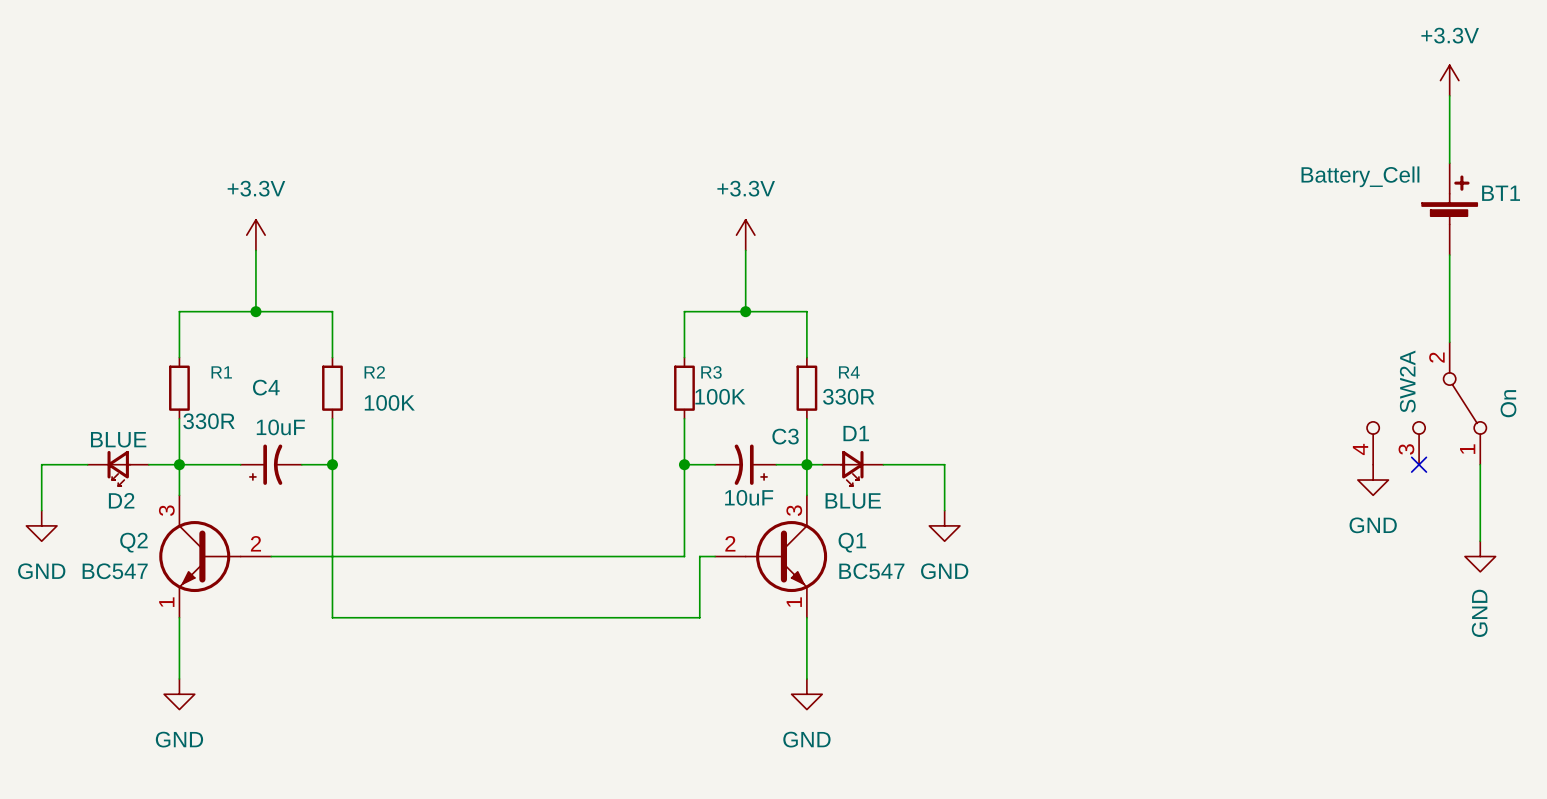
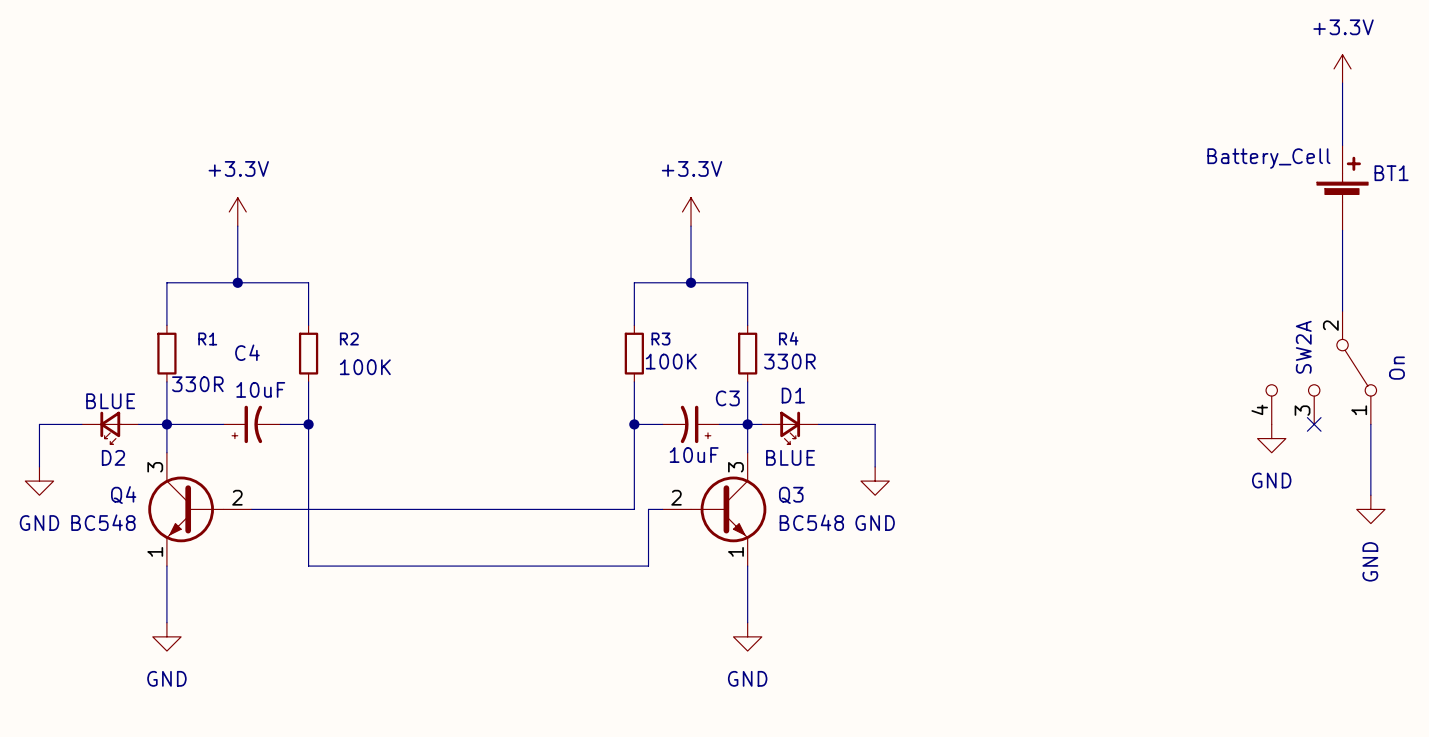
Q2 name: Q2 (133, 542) -> Q4 (123, 495)
Q1 name: Q1 (852, 542) -> Q3 (791, 495)
Q2 value: BC547 (115, 571) -> BC548 (103, 522)
Q1 value: BC547 (871, 571) -> BC548 (811, 522)

